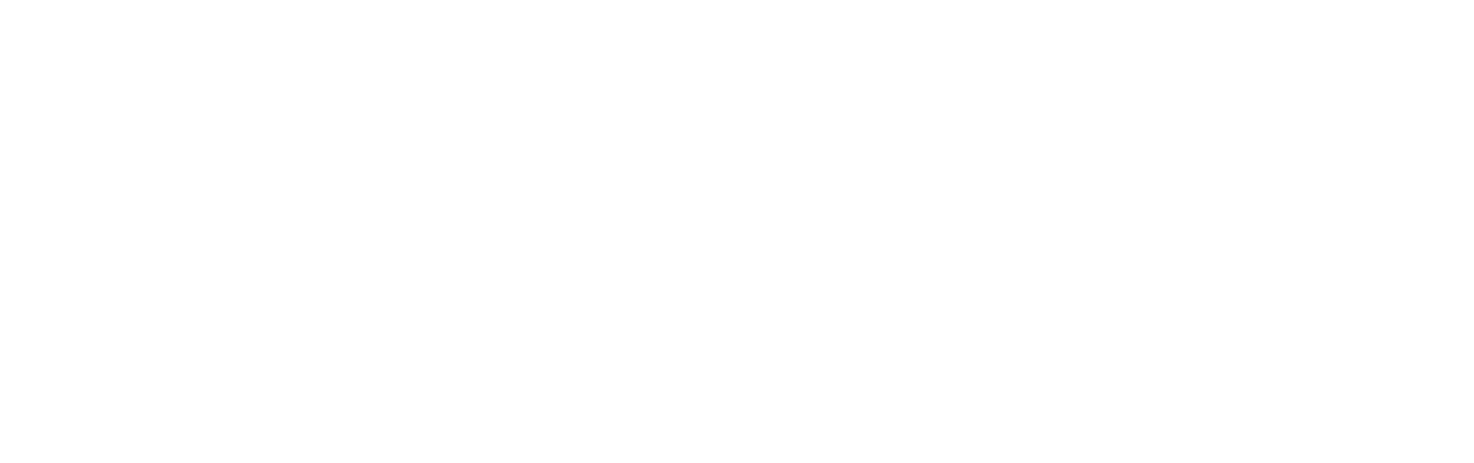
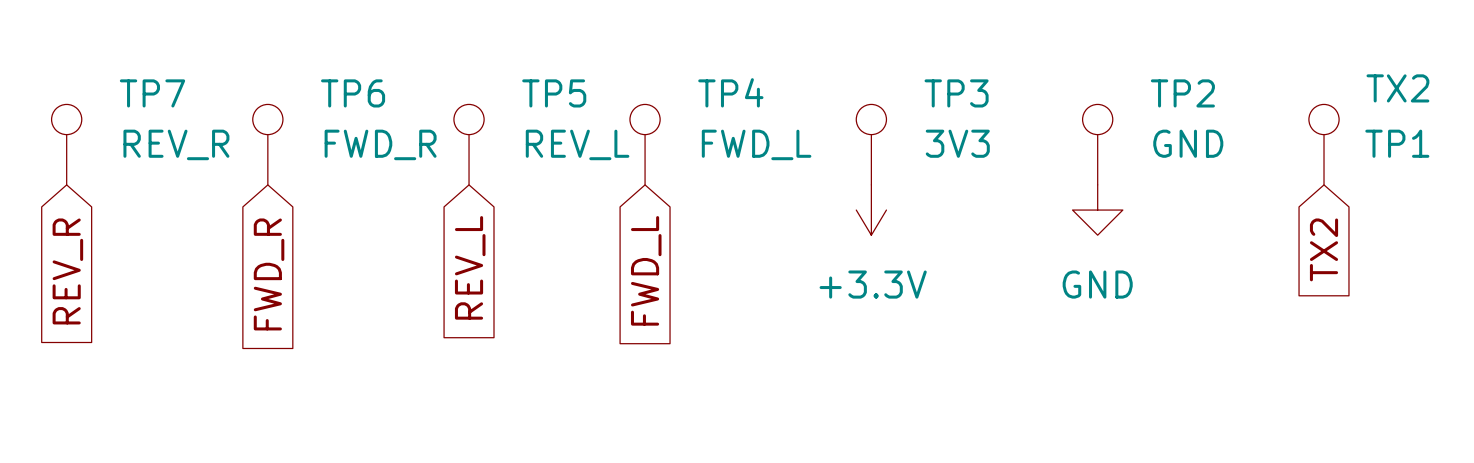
TP7: none -> REV_R (66, 144)
TP6: none -> FWD_R (267, 144)
TP5: none -> REV_L (469, 144)
TP4: none -> FWD_L (645, 144)
TP3: none -> 3V3 (871, 144)
TP2: none -> GND (1097, 144)
TP1: none -> TX2 (1324, 144)
power symbol: none -> +3.3V (871, 210)
power symbol: none -> GND (1097, 210)
global label: none -> TX2 (1324, 249)
global label: none -> REV_L (470, 267)
global label: none -> FWD_L (646, 270)
global label: none -> REV_R (67, 271)
global label: none -> FWD_R (269, 274)

